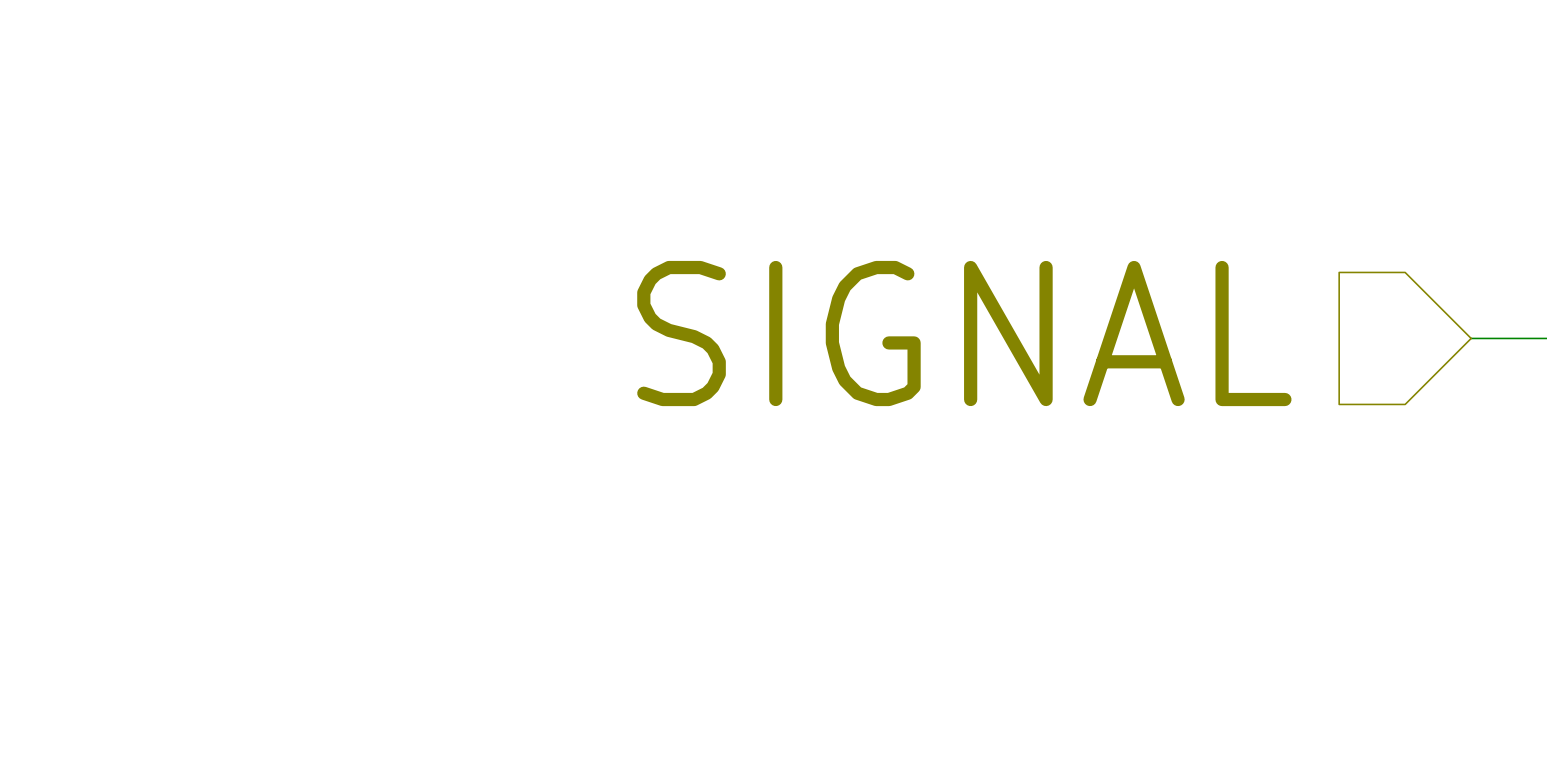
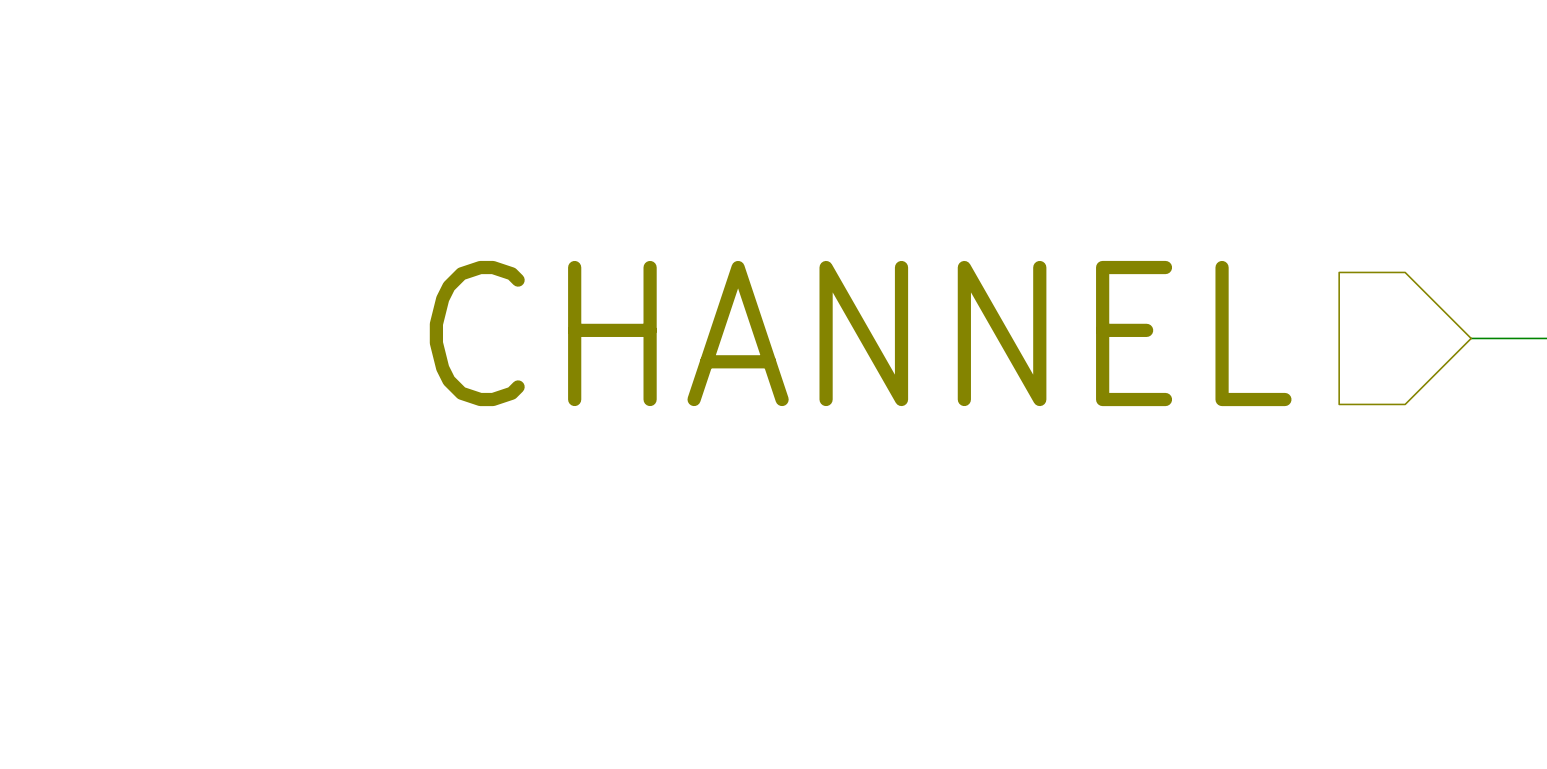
hierarchical label: SIGNAL (964, 333) -> CHANNEL (860, 333)

